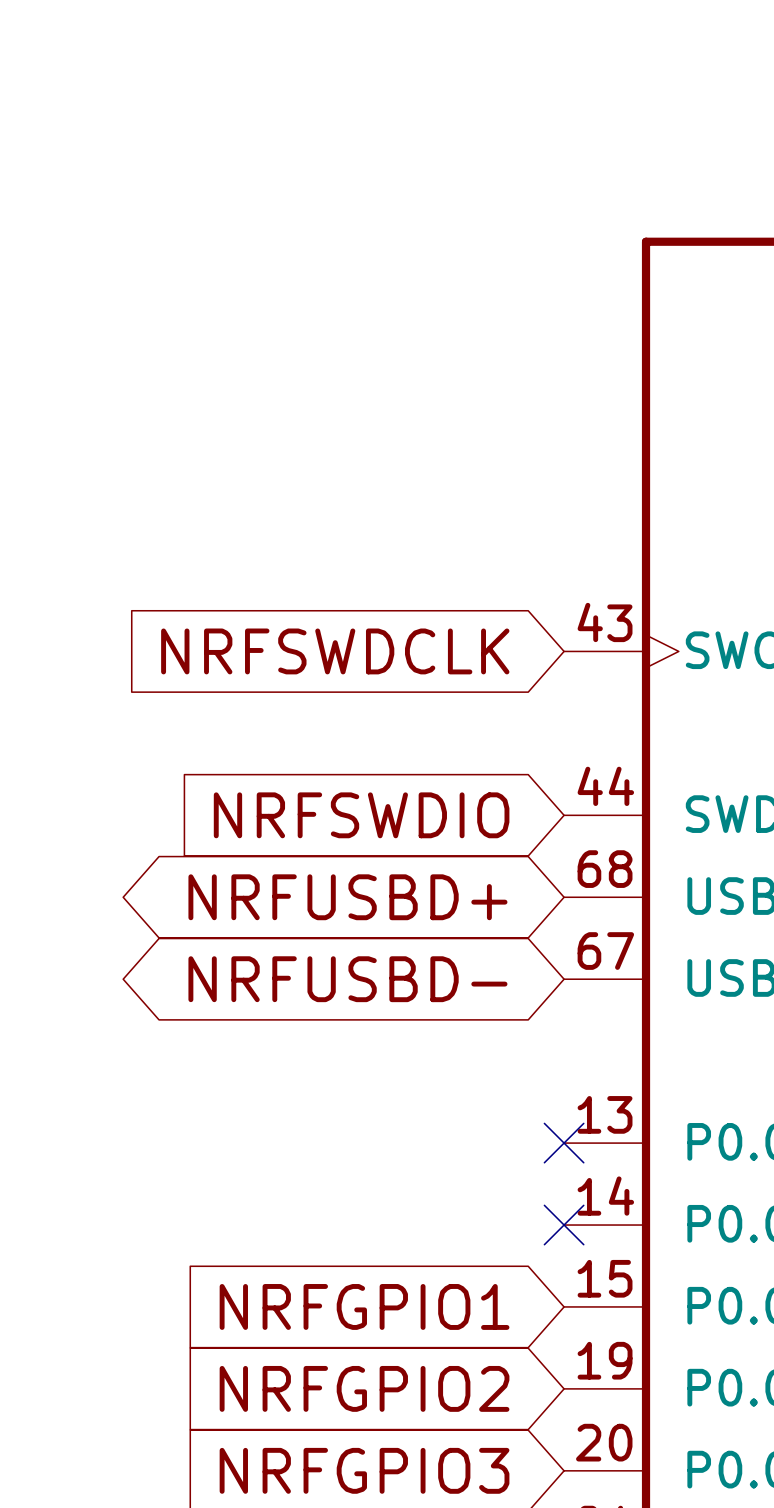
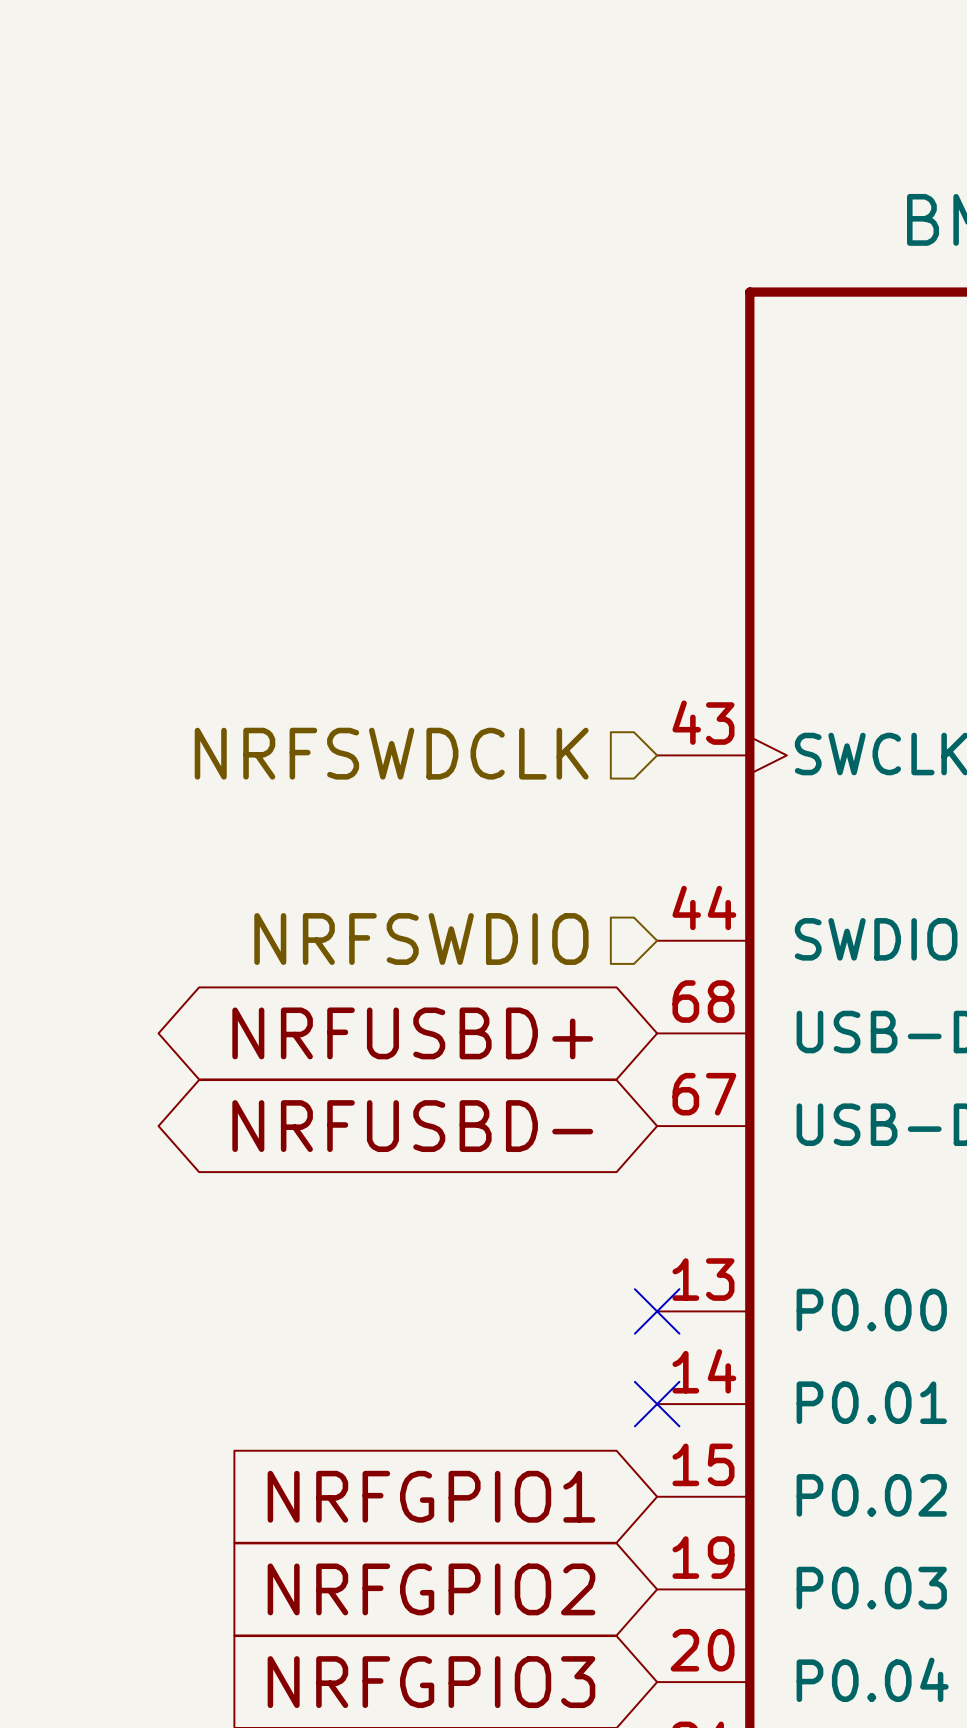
hierarchical label: none -> NRFSWDCLK (391, 753)
global label: NRFSWDCLK (335, 651) -> none
hierarchical label: none -> NRFSWDIO (421, 939)
global label: NRFSWDIO (361, 815) -> none

